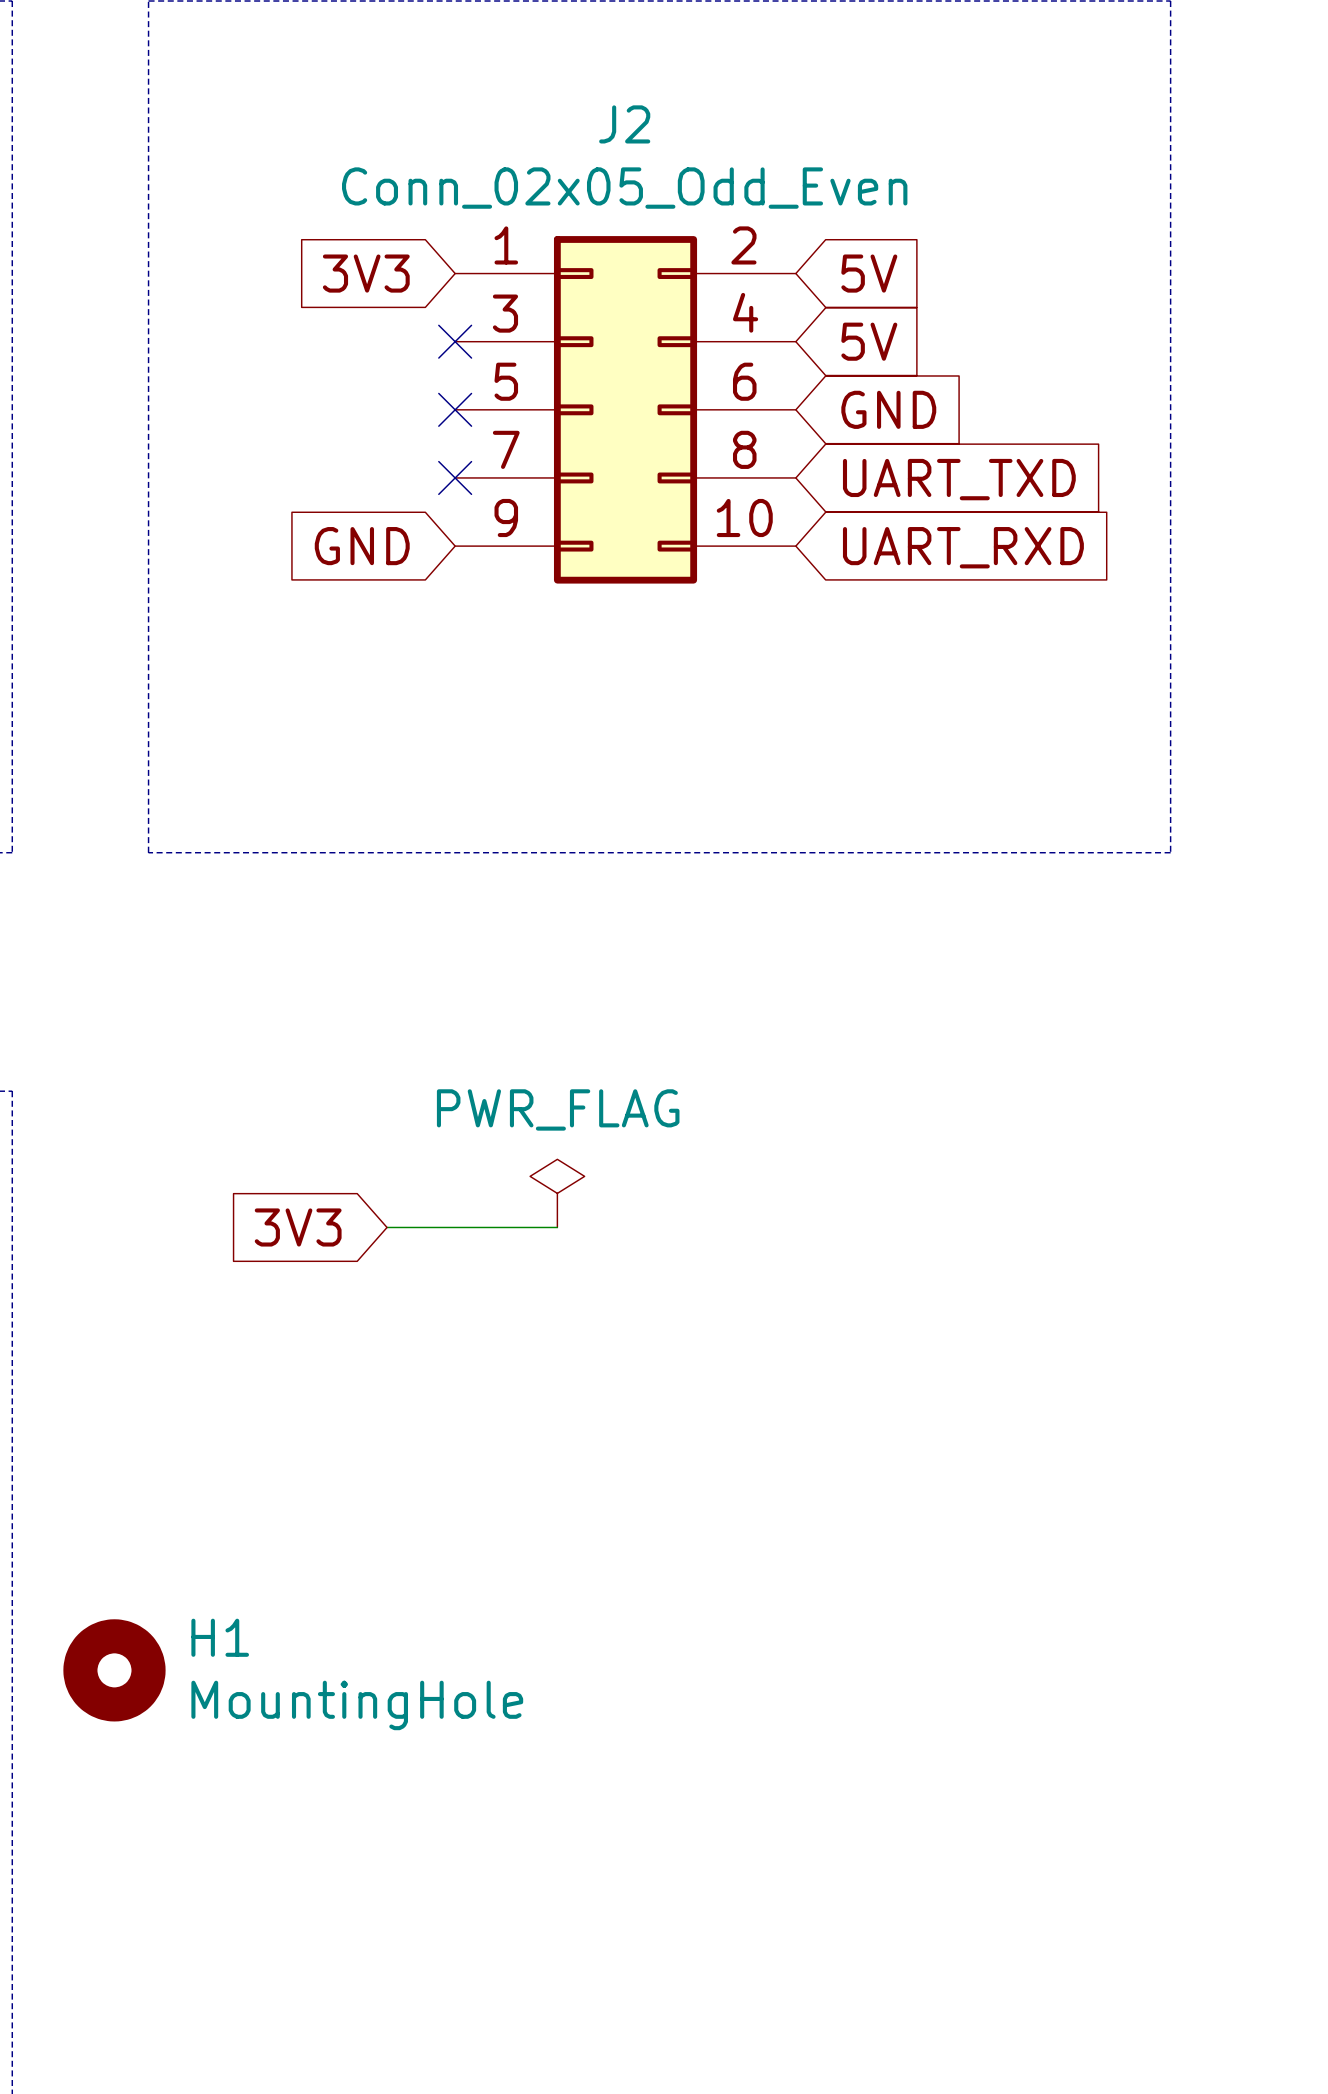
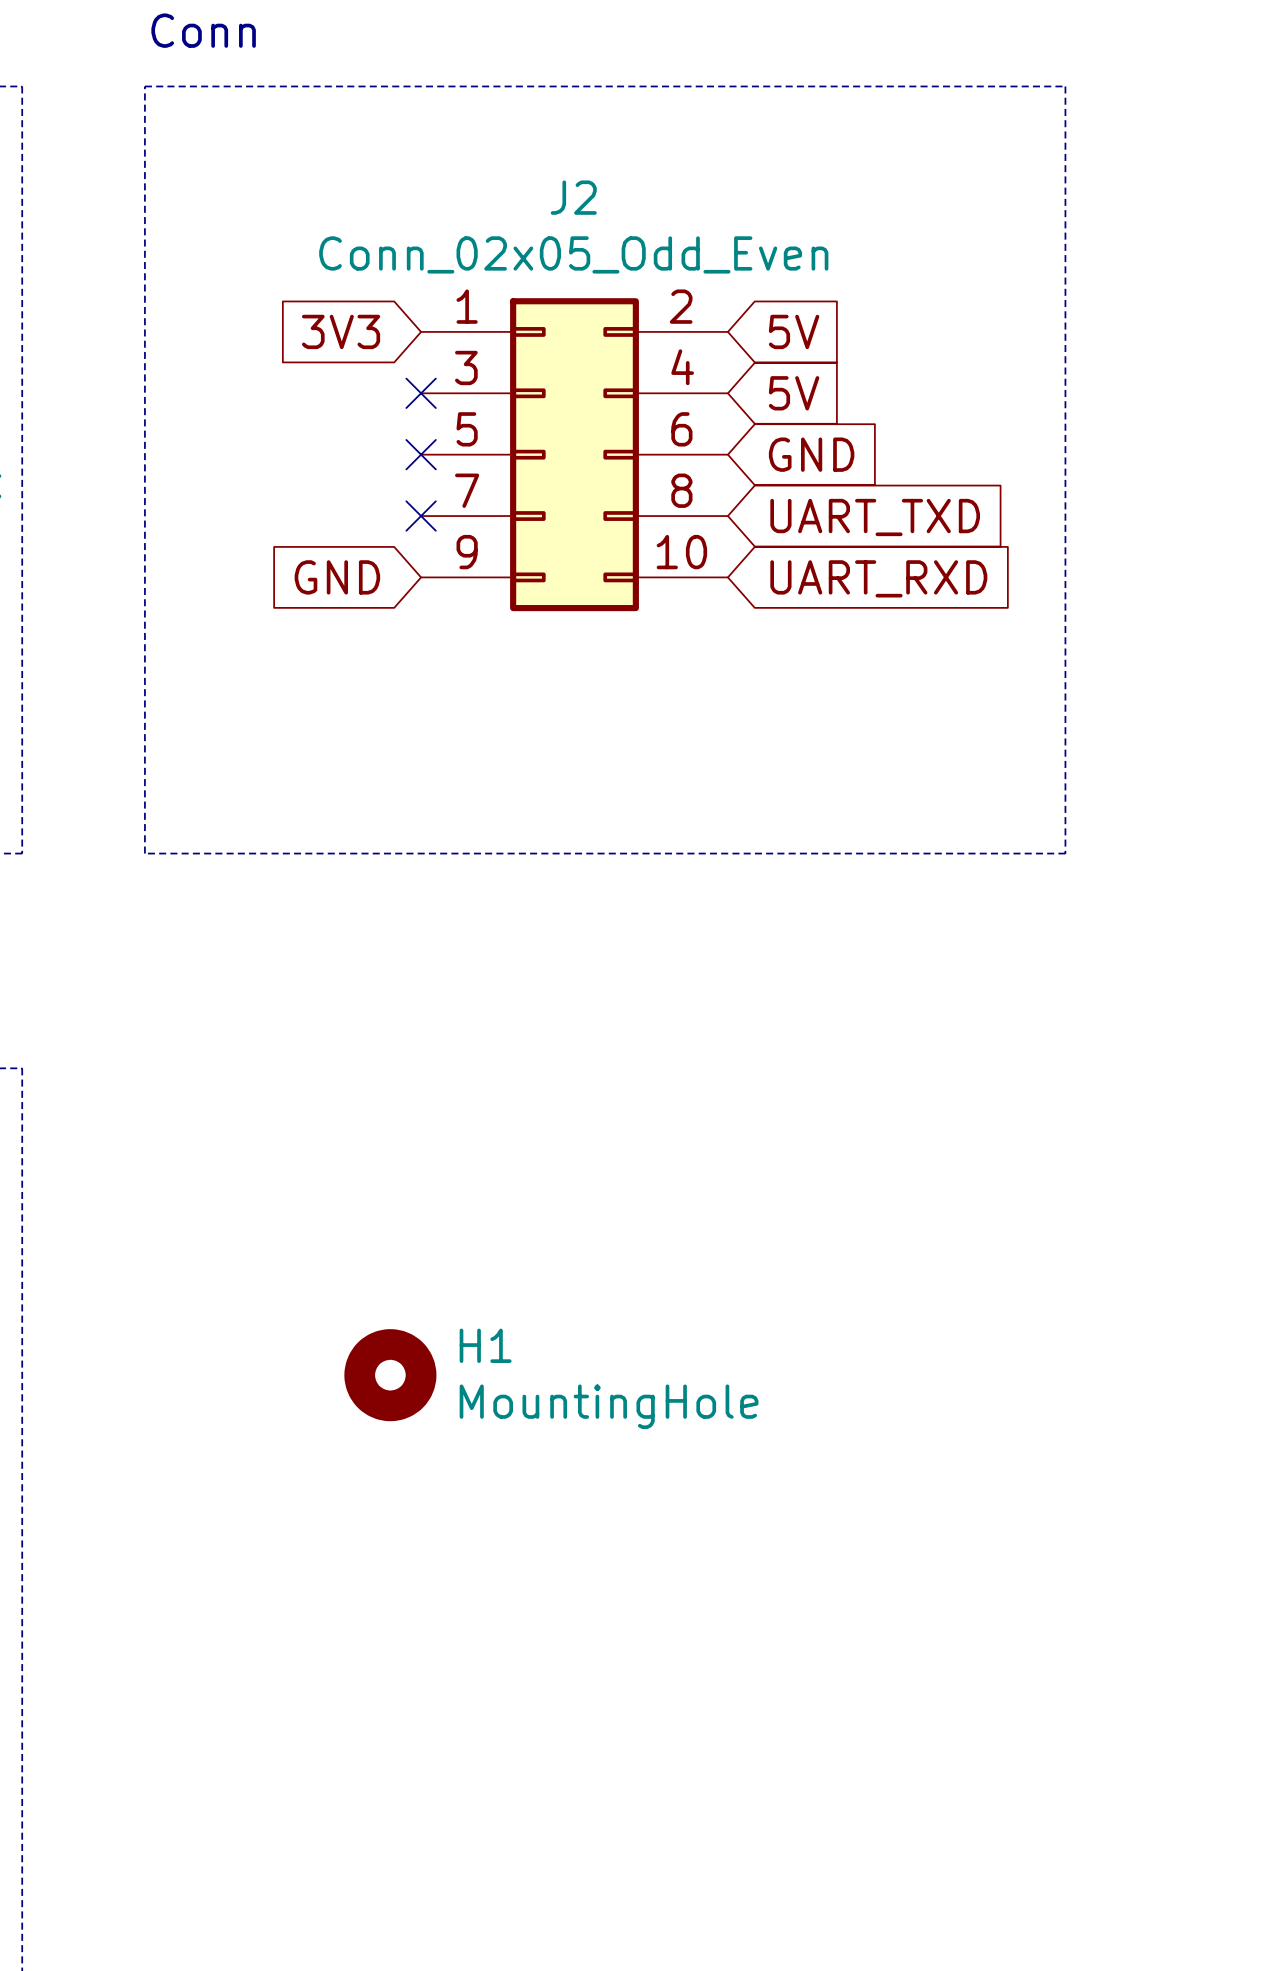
power symbol: PWR_FLAG (557, 1193) -> none
global label: 3V3 (298, 1227) -> none
wire: (387, 1227) (557, 1227) -> none
H1 position: (114, 1670) -> (390, 1375)

